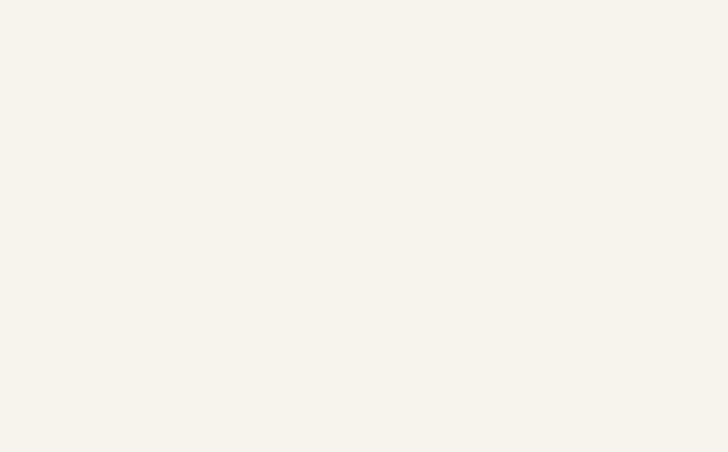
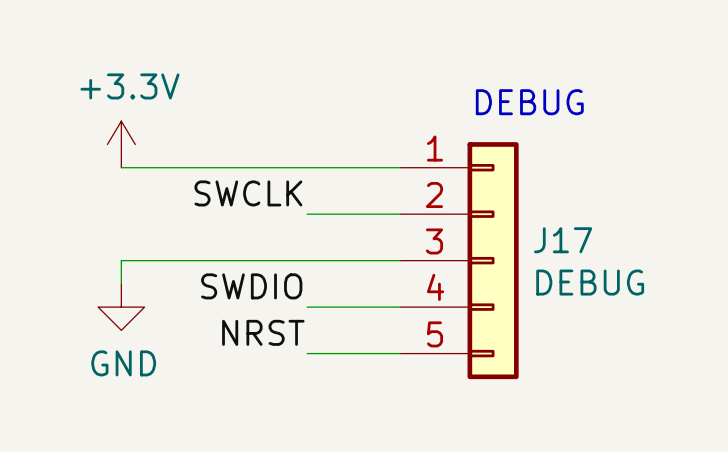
text: none -> DEBUG (529, 102)
power symbol: none -> +3.3V (121, 144)
wire: none -> (121, 167) (400, 167)
label: none -> SWCLK (248, 193)
wire: none -> (307, 214) (400, 214)
wire: none -> (400, 260) (121, 260) (121, 283)
J17: none -> DEBUG (459, 260)
label: none -> SWDIO (251, 286)
power symbol: none -> GND (121, 307)
wire: none -> (307, 307) (400, 307)
label: none -> NRST (263, 332)
wire: none -> (307, 353) (400, 353)

